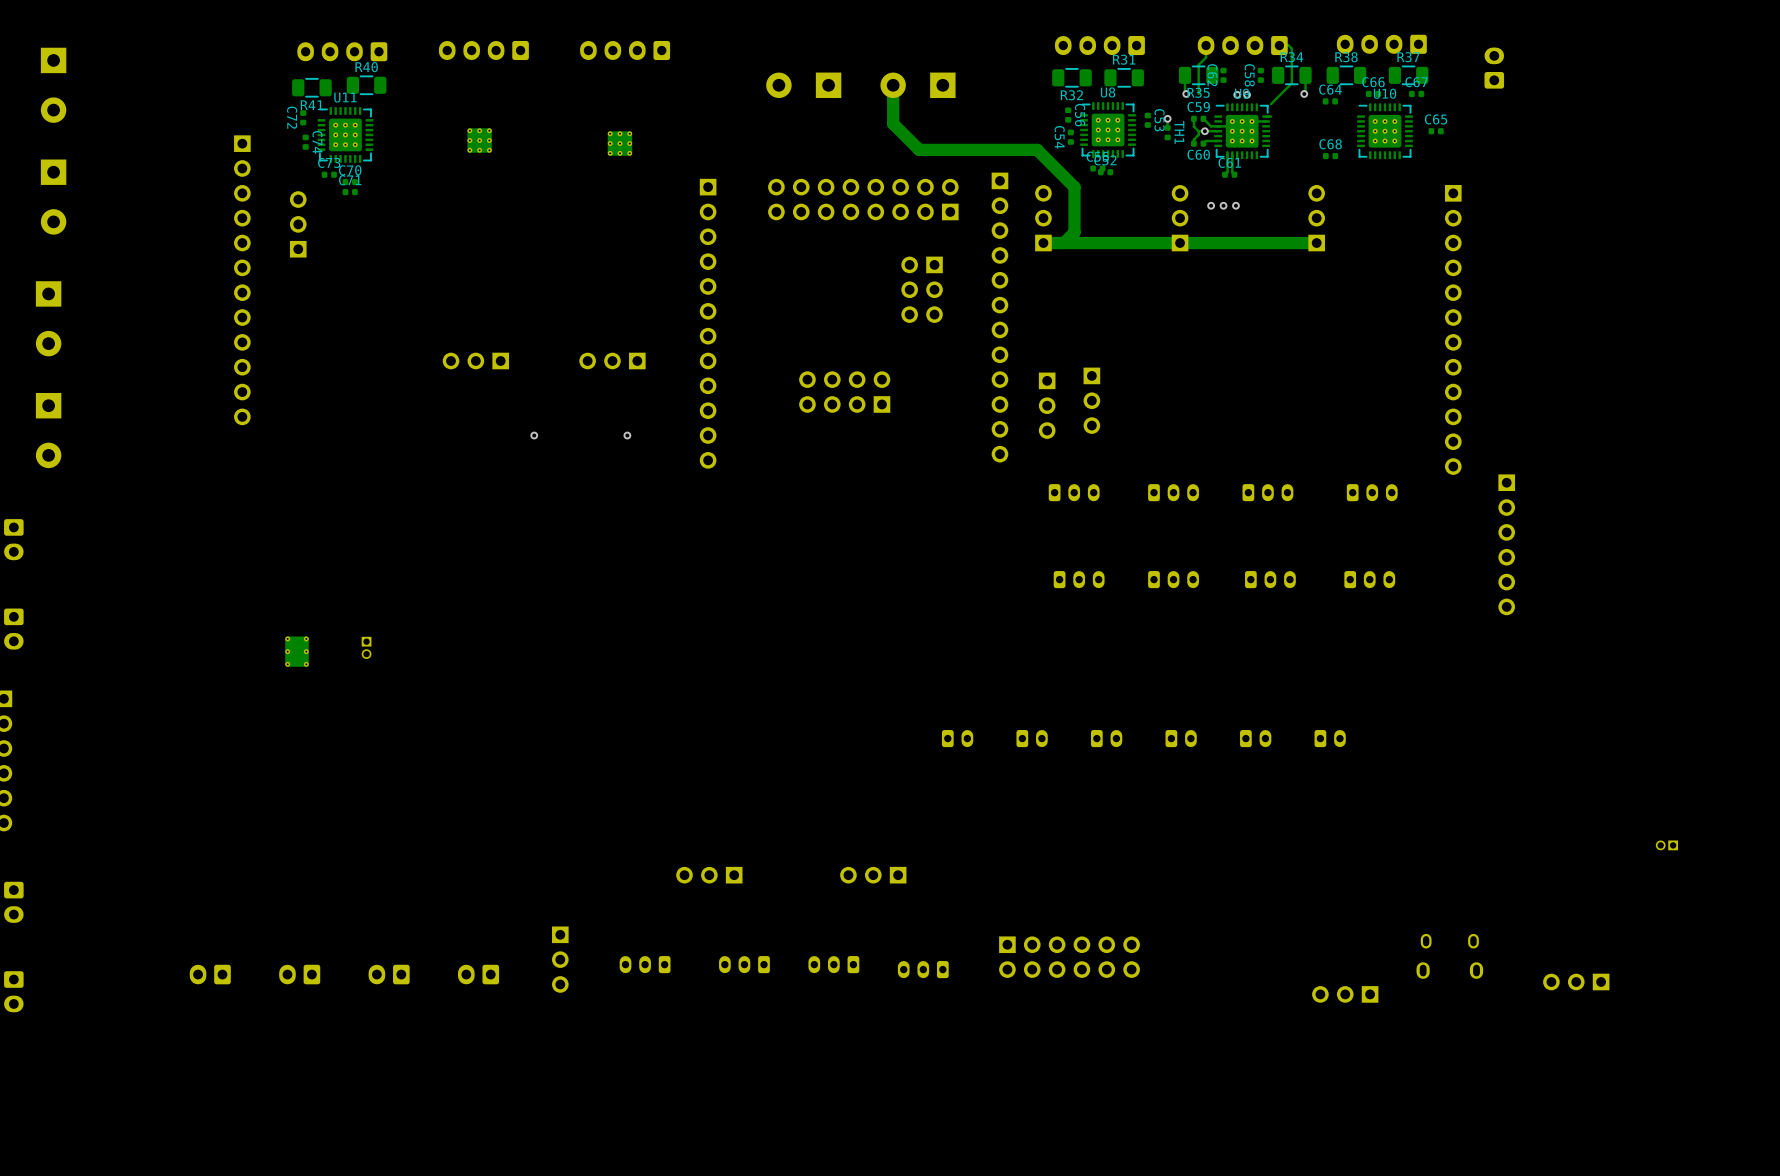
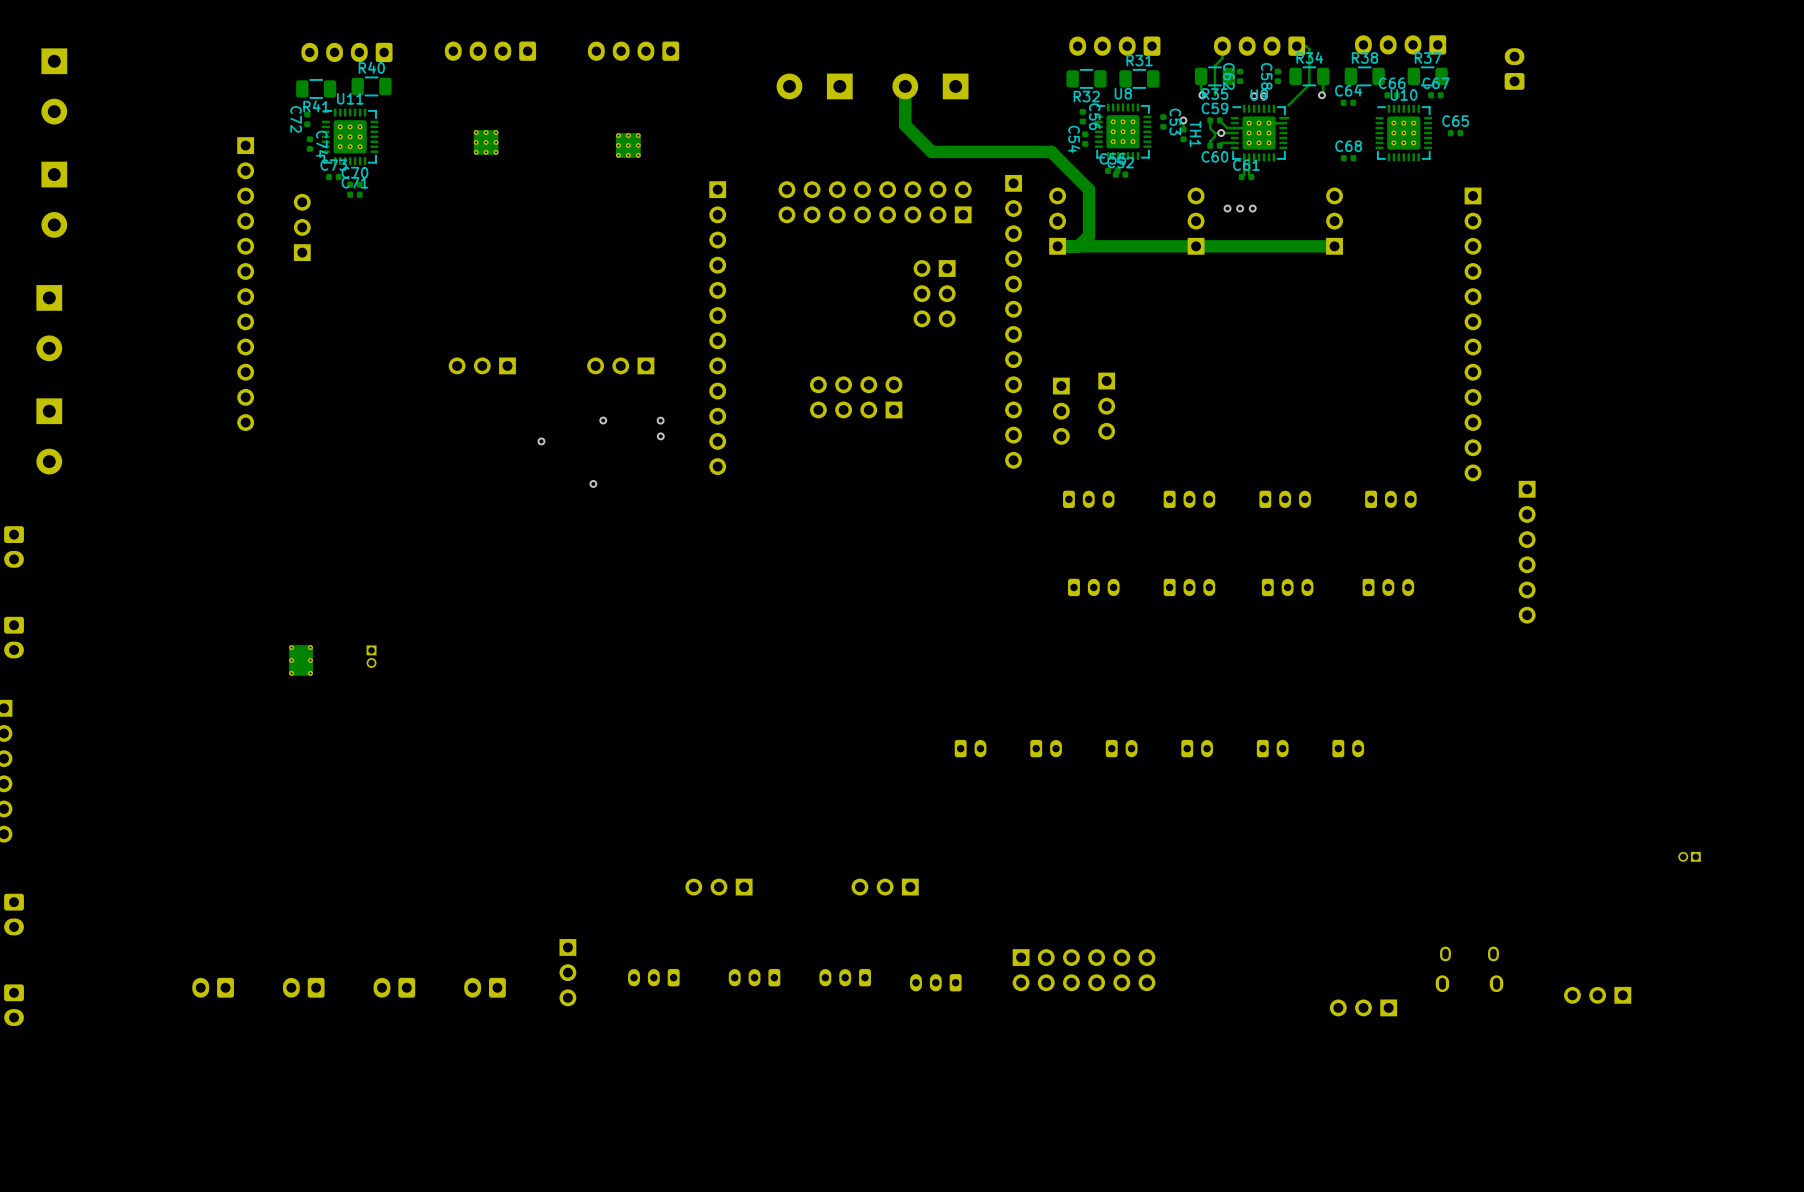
via: none -> (603, 420)
via: none -> (660, 420)
via: none -> (660, 436)
via: (627, 435) -> none
via: none -> (593, 483)

